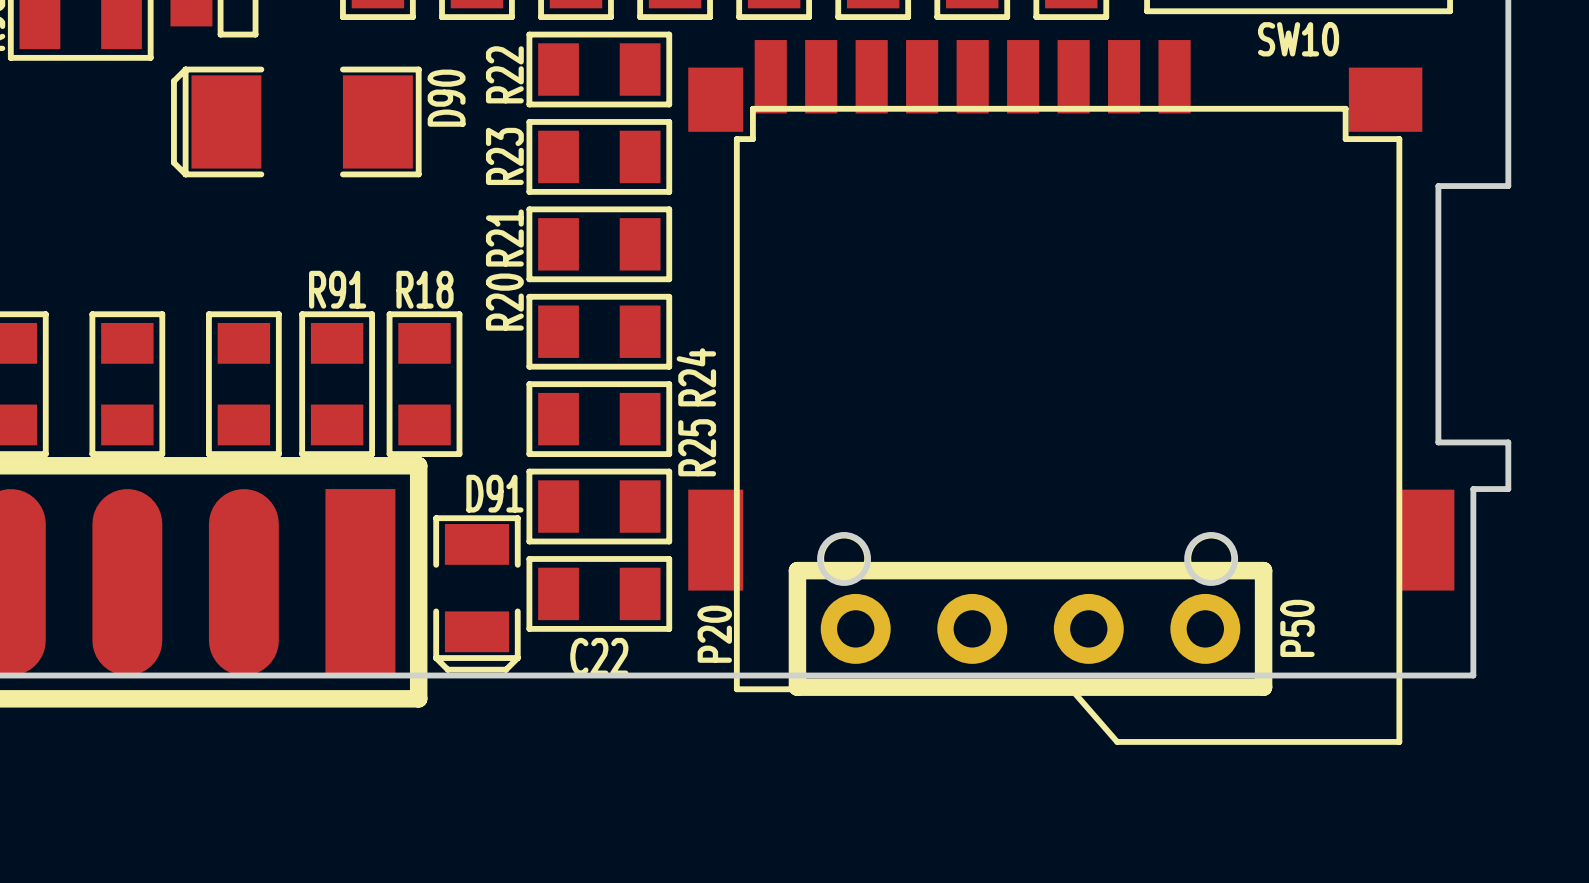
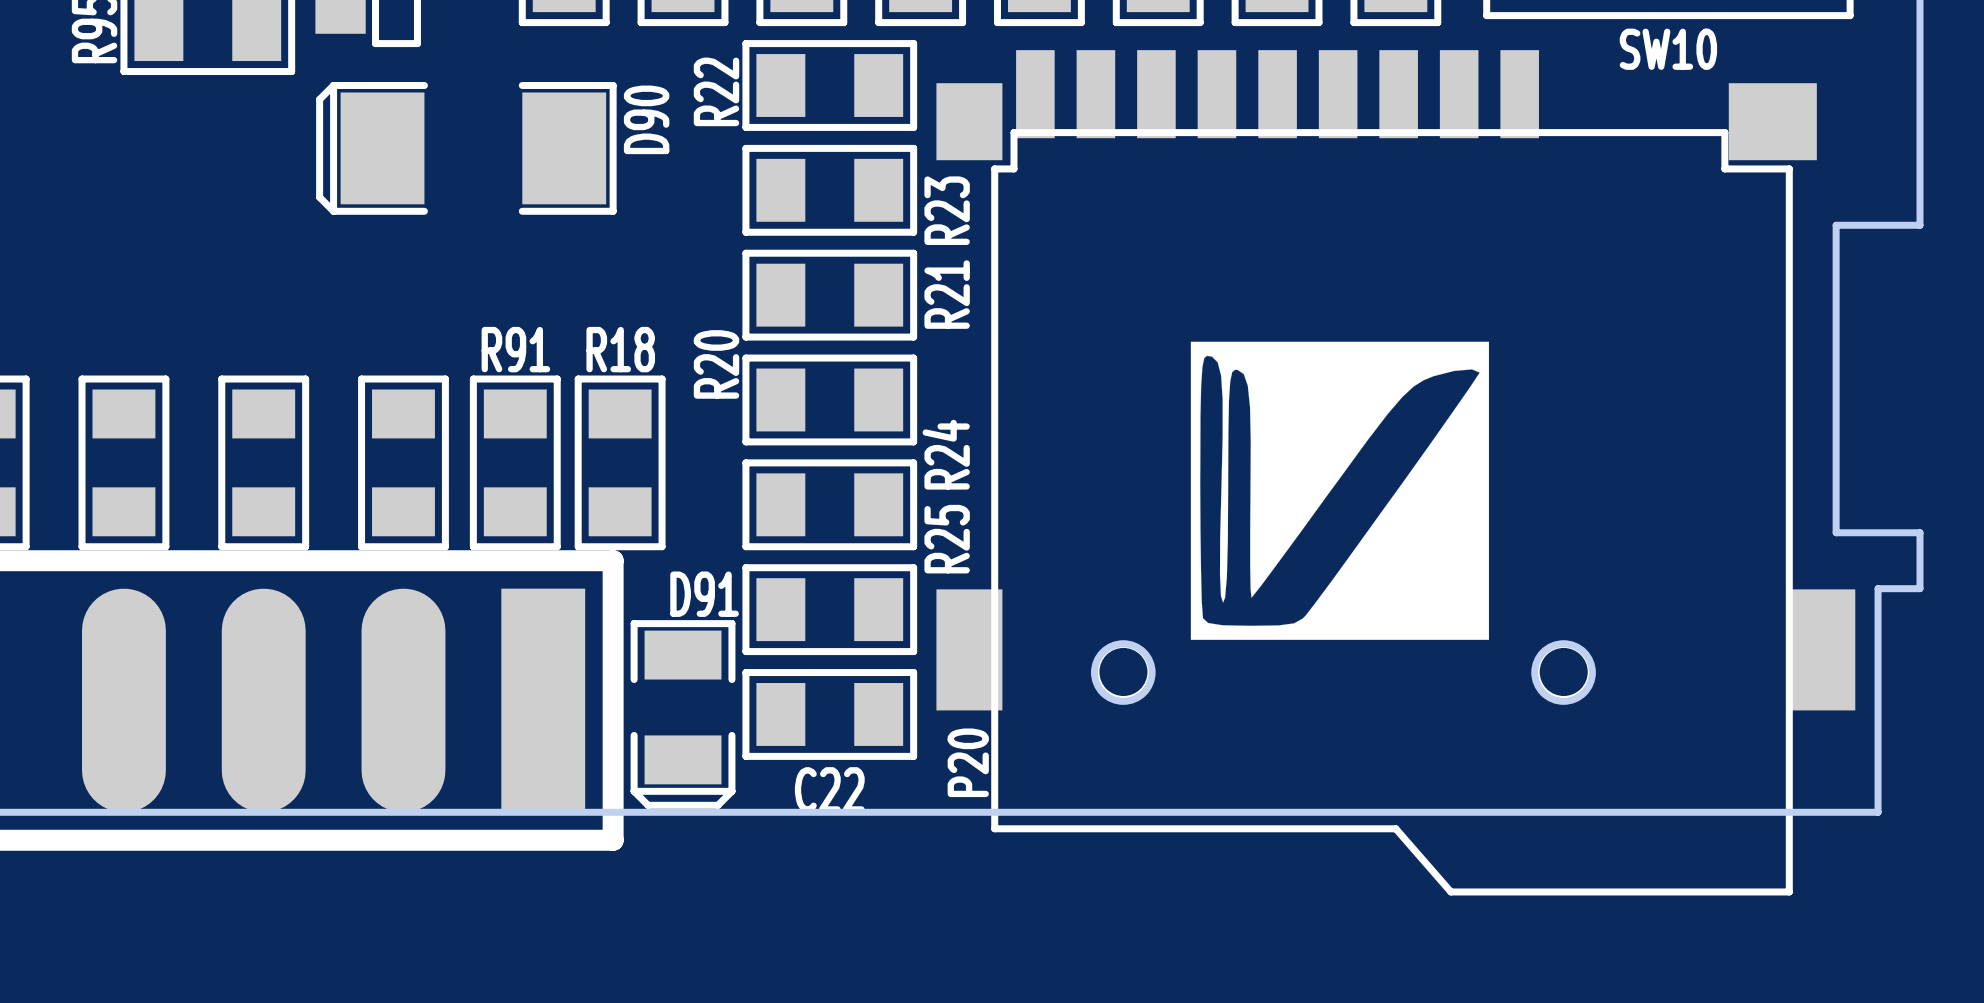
R23 name position: R23 (504, 156) -> R23 (947, 210)
R21 name position: R21 (504, 238) -> R21 (947, 294)
drawing: none -> [1190, 341, 1490, 640]
P50: (1030, 628) -> none

